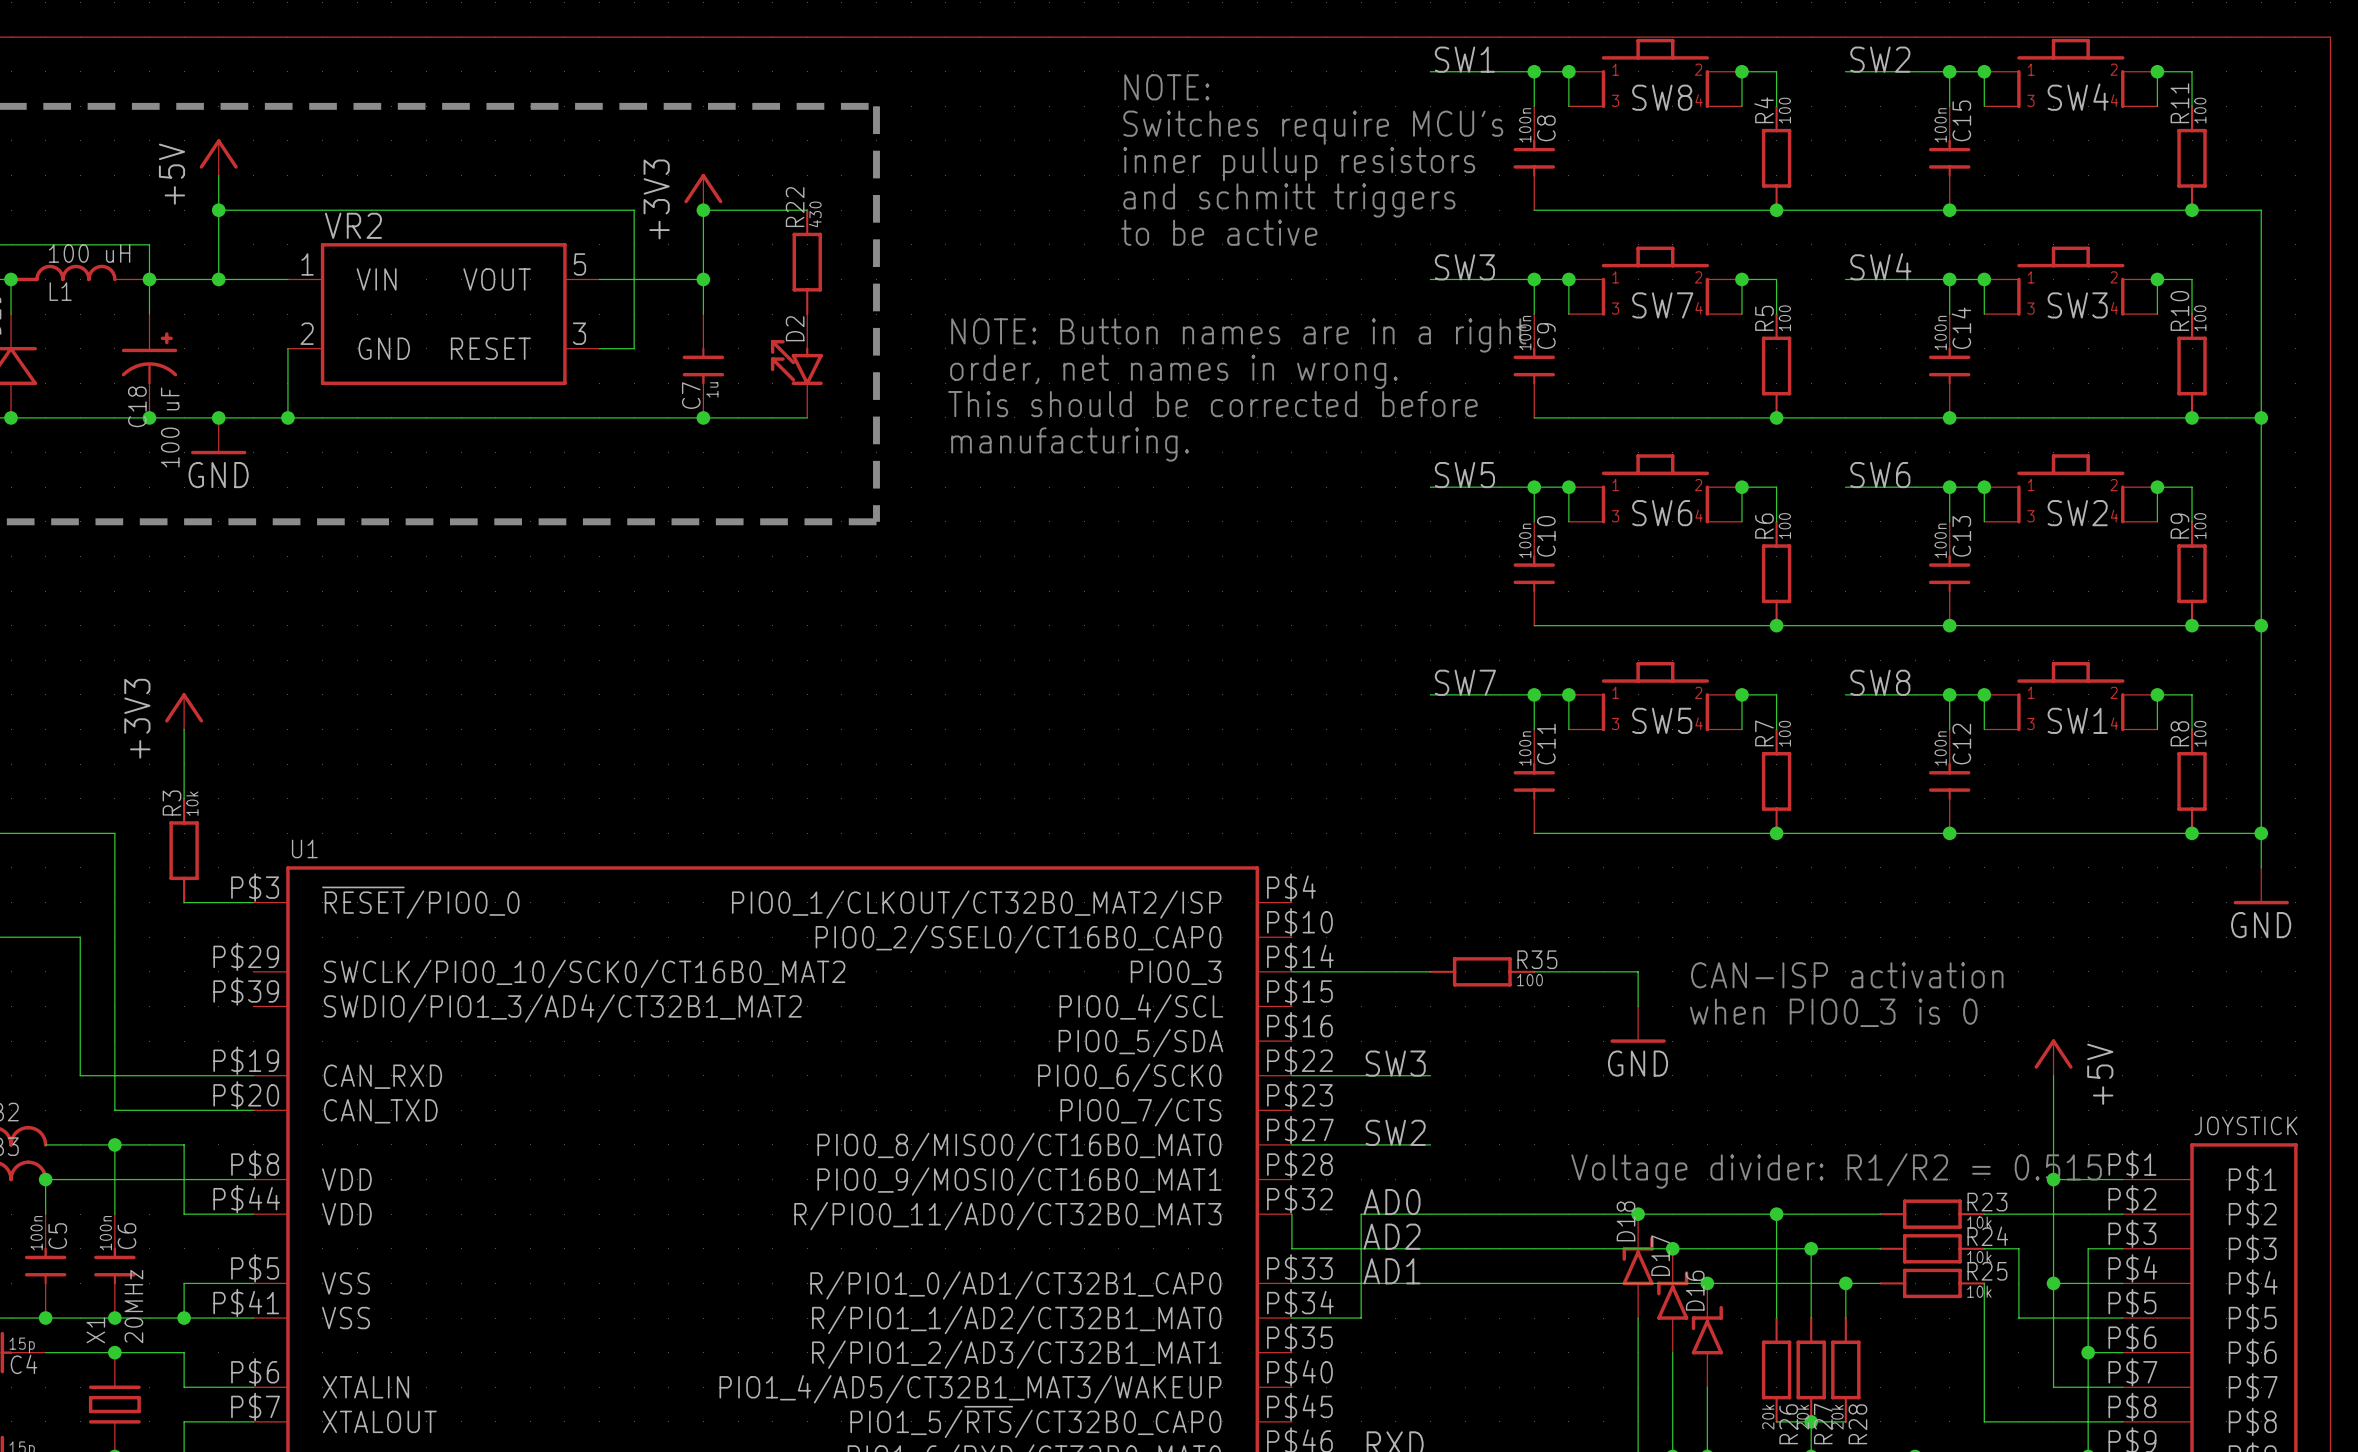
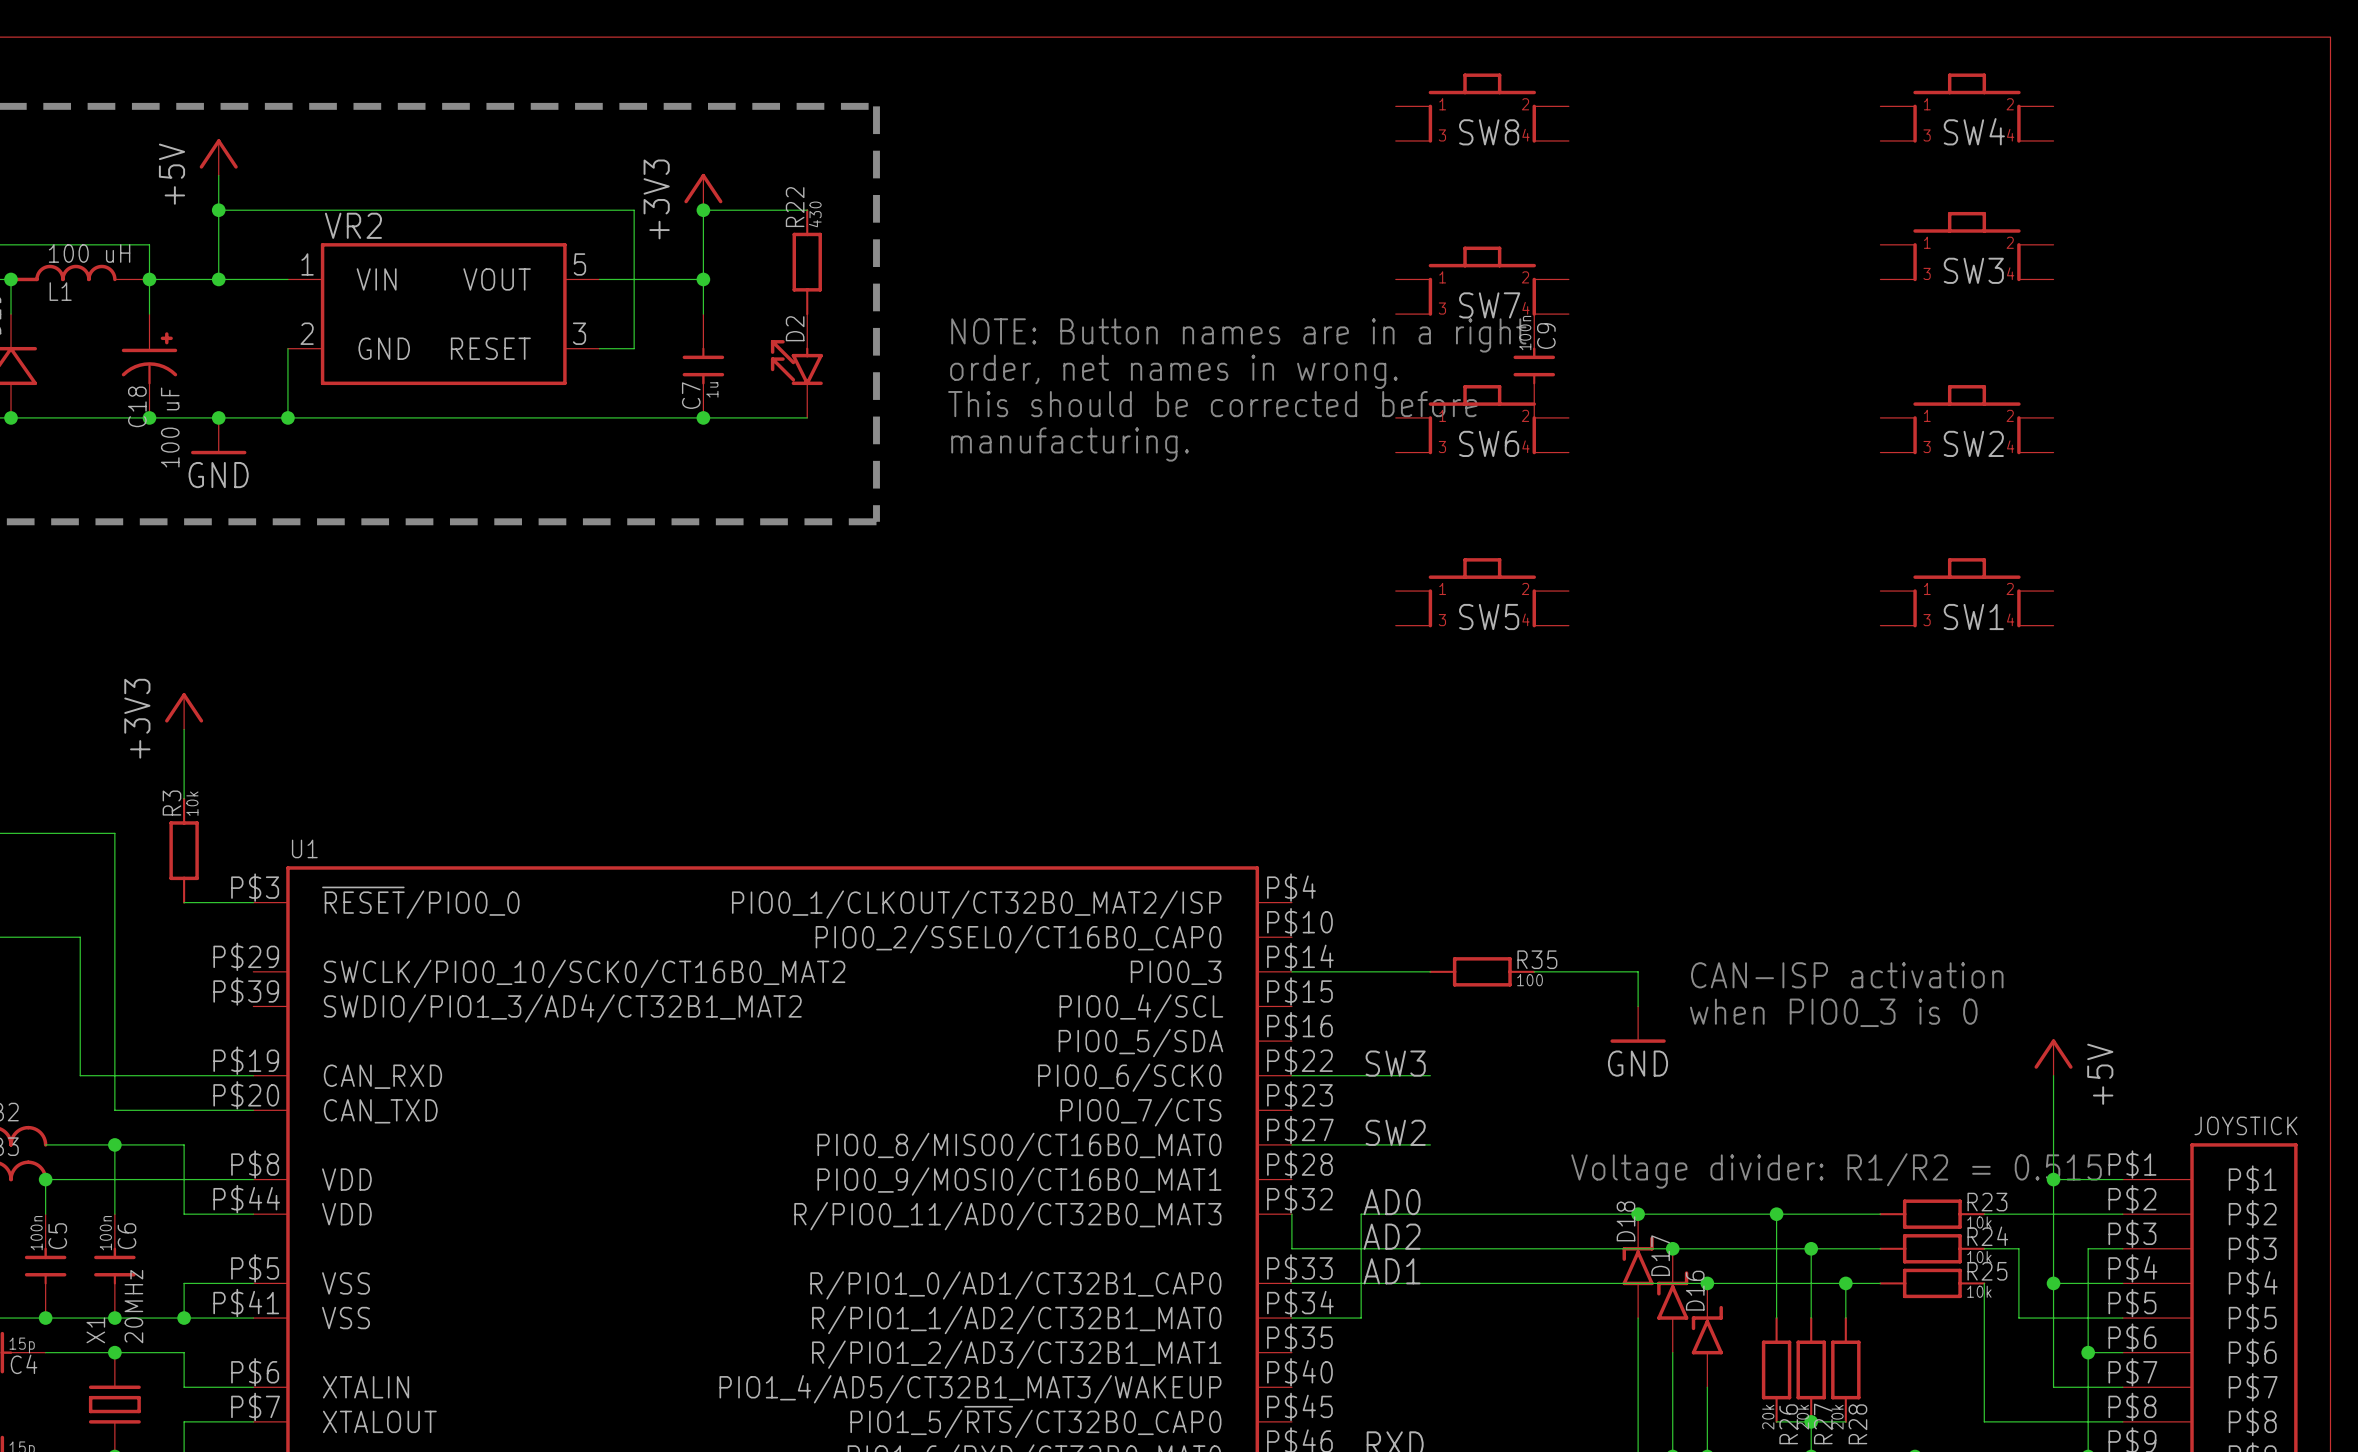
label: SW1 (1464, 59) -> none
label: SW2 (1880, 59) -> none
wire: (1430, 71) (1568, 71) (1568, 106) -> none
wire: (1534, 71) (1534, 106) -> none
junction: (1534, 71) -> none
junction: (1568, 71) -> none
junction: (1741, 71) -> none
wire: (1845, 71) (1984, 71) (1984, 106) -> none
junction: (1949, 71) -> none
junction: (1984, 71) -> none
junction: (2157, 71) -> none
SW8 position: (1655, 73) -> (1482, 108)
SW4 position: (2070, 73) -> (1966, 108)
text: NOTE: (1166, 87) -> none
wire: (1741, 106) (1741, 71) (1776, 71) (1776, 106) -> none
wire: (2157, 106) (2157, 71) (2192, 71) (2192, 106) -> none
text: Switches require MCU's (1313, 127) -> none
C8: 100n (1534, 158) -> none
R4: 100 (1776, 158) -> none
C15: 100n (1949, 158) -> none
R11: 100 (2192, 158) -> none
text: inner pullup resistors (1299, 164) -> none
text: and schmitt triggers (1289, 200) -> none
wire: (1534, 210) (2261, 210) (2261, 867) -> none
junction: (1776, 210) -> none
junction: (1949, 210) -> none
junction: (2192, 210) -> none
text: to be active (1219, 232) -> none
label: SW4 (1880, 266) -> none
label: SW3 (1464, 267) -> none
wire: (1430, 279) (1568, 279) (1568, 314) -> none
junction: (1534, 279) -> none
junction: (1568, 279) -> none
junction: (1741, 279) -> none
wire: (1845, 279) (1984, 279) (1984, 314) -> none
wire: (1949, 279) (1949, 314) -> none
junction: (1949, 279) -> none
junction: (1984, 279) -> none
junction: (2157, 279) -> none
SW7 position: (1655, 281) -> (1482, 281)
SW3 position: (2070, 281) -> (1966, 246)
wire: (1741, 314) (1741, 279) (1776, 279) (1776, 314) -> none
wire: (2157, 314) (2157, 279) (2192, 279) (2192, 314) -> none
R5: 100 (1776, 366) -> none
C14: 100n (1949, 366) -> none
R10: 100 (2192, 366) -> none
wire: (1534, 417) (2261, 417) -> none
junction: (1776, 417) -> none
junction: (1949, 417) -> none
junction: (2192, 417) -> none
junction: (2261, 417) -> none
label: SW5 (1464, 475) -> none
label: SW6 (1880, 475) -> none
wire: (1430, 487) (1568, 487) (1568, 521) -> none
wire: (1534, 487) (1534, 521) -> none
junction: (1534, 487) -> none
junction: (1568, 487) -> none
junction: (1741, 487) -> none
wire: (1845, 487) (1984, 487) (1984, 521) -> none
wire: (1949, 487) (1949, 521) -> none
junction: (1949, 487) -> none
junction: (1984, 487) -> none
junction: (2157, 487) -> none
SW6 position: (1655, 488) -> (1482, 419)
SW2 position: (2070, 488) -> (1966, 419)
wire: (1741, 521) (1741, 487) (1776, 487) (1776, 521) -> none
wire: (2157, 521) (2157, 487) (2192, 487) (2192, 521) -> none
C10: 100n (1534, 573) -> none
R6: 100 (1776, 573) -> none
C13: 100n (1949, 573) -> none
R9: 100 (2192, 573) -> none
wire: (1534, 625) (2261, 625) -> none
junction: (1776, 625) -> none
junction: (1949, 625) -> none
junction: (2192, 625) -> none
junction: (2261, 625) -> none
label: SW7 (1465, 682) -> none
label: SW8 (1880, 682) -> none
wire: (1430, 694) (1568, 694) (1568, 729) -> none
wire: (1534, 694) (1534, 729) -> none
junction: (1534, 694) -> none
junction: (1568, 694) -> none
junction: (1741, 694) -> none
wire: (1845, 694) (1984, 694) (1984, 729) -> none
wire: (1949, 694) (1949, 729) -> none
junction: (1949, 694) -> none
junction: (1984, 694) -> none
junction: (2157, 694) -> none
SW5 position: (1655, 696) -> (1482, 592)
SW1 position: (2070, 696) -> (1966, 592)
wire: (1741, 729) (1741, 694) (1776, 694) (1776, 729) -> none
wire: (2157, 729) (2157, 694) (2192, 694) (2192, 729) -> none
C11: 100n (1534, 781) -> none
R7: 100 (1776, 781) -> none
C12: 100n (1949, 781) -> none
R8: 100 (2192, 781) -> none
wire: (1534, 833) (2261, 833) -> none
junction: (1776, 833) -> none
junction: (1949, 833) -> none
junction: (2192, 833) -> none
junction: (2261, 833) -> none
power symbol: GND (2261, 886) -> none

